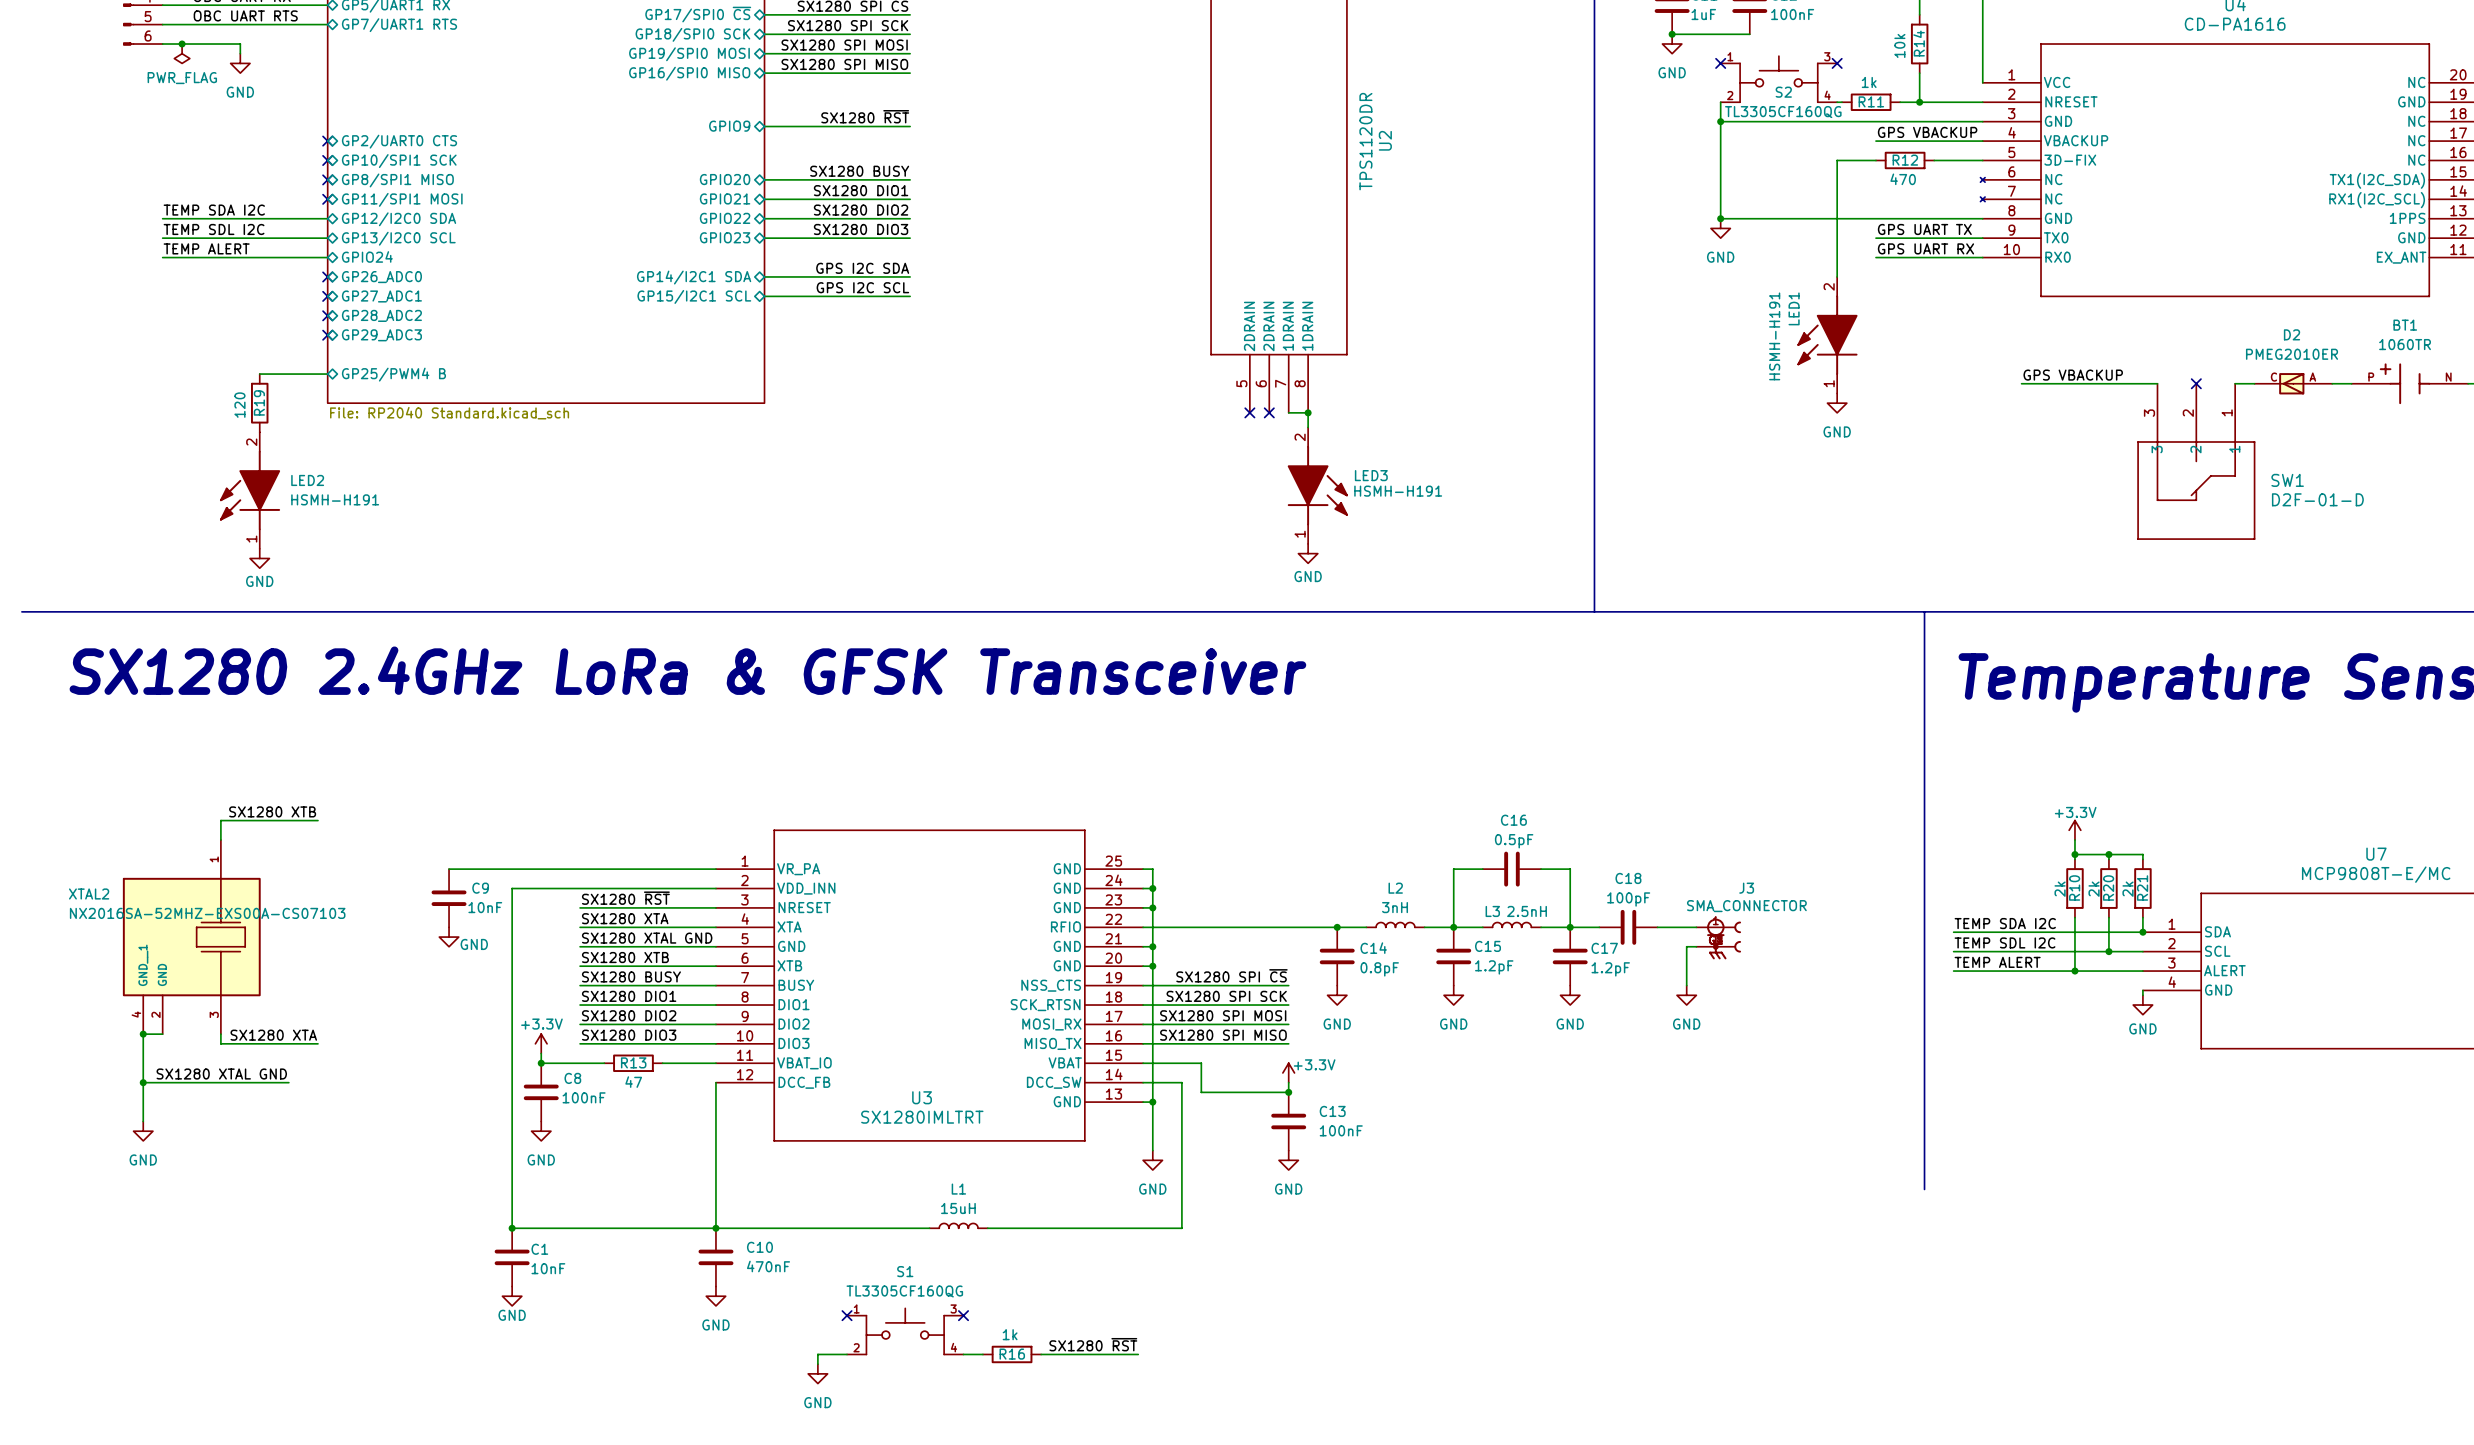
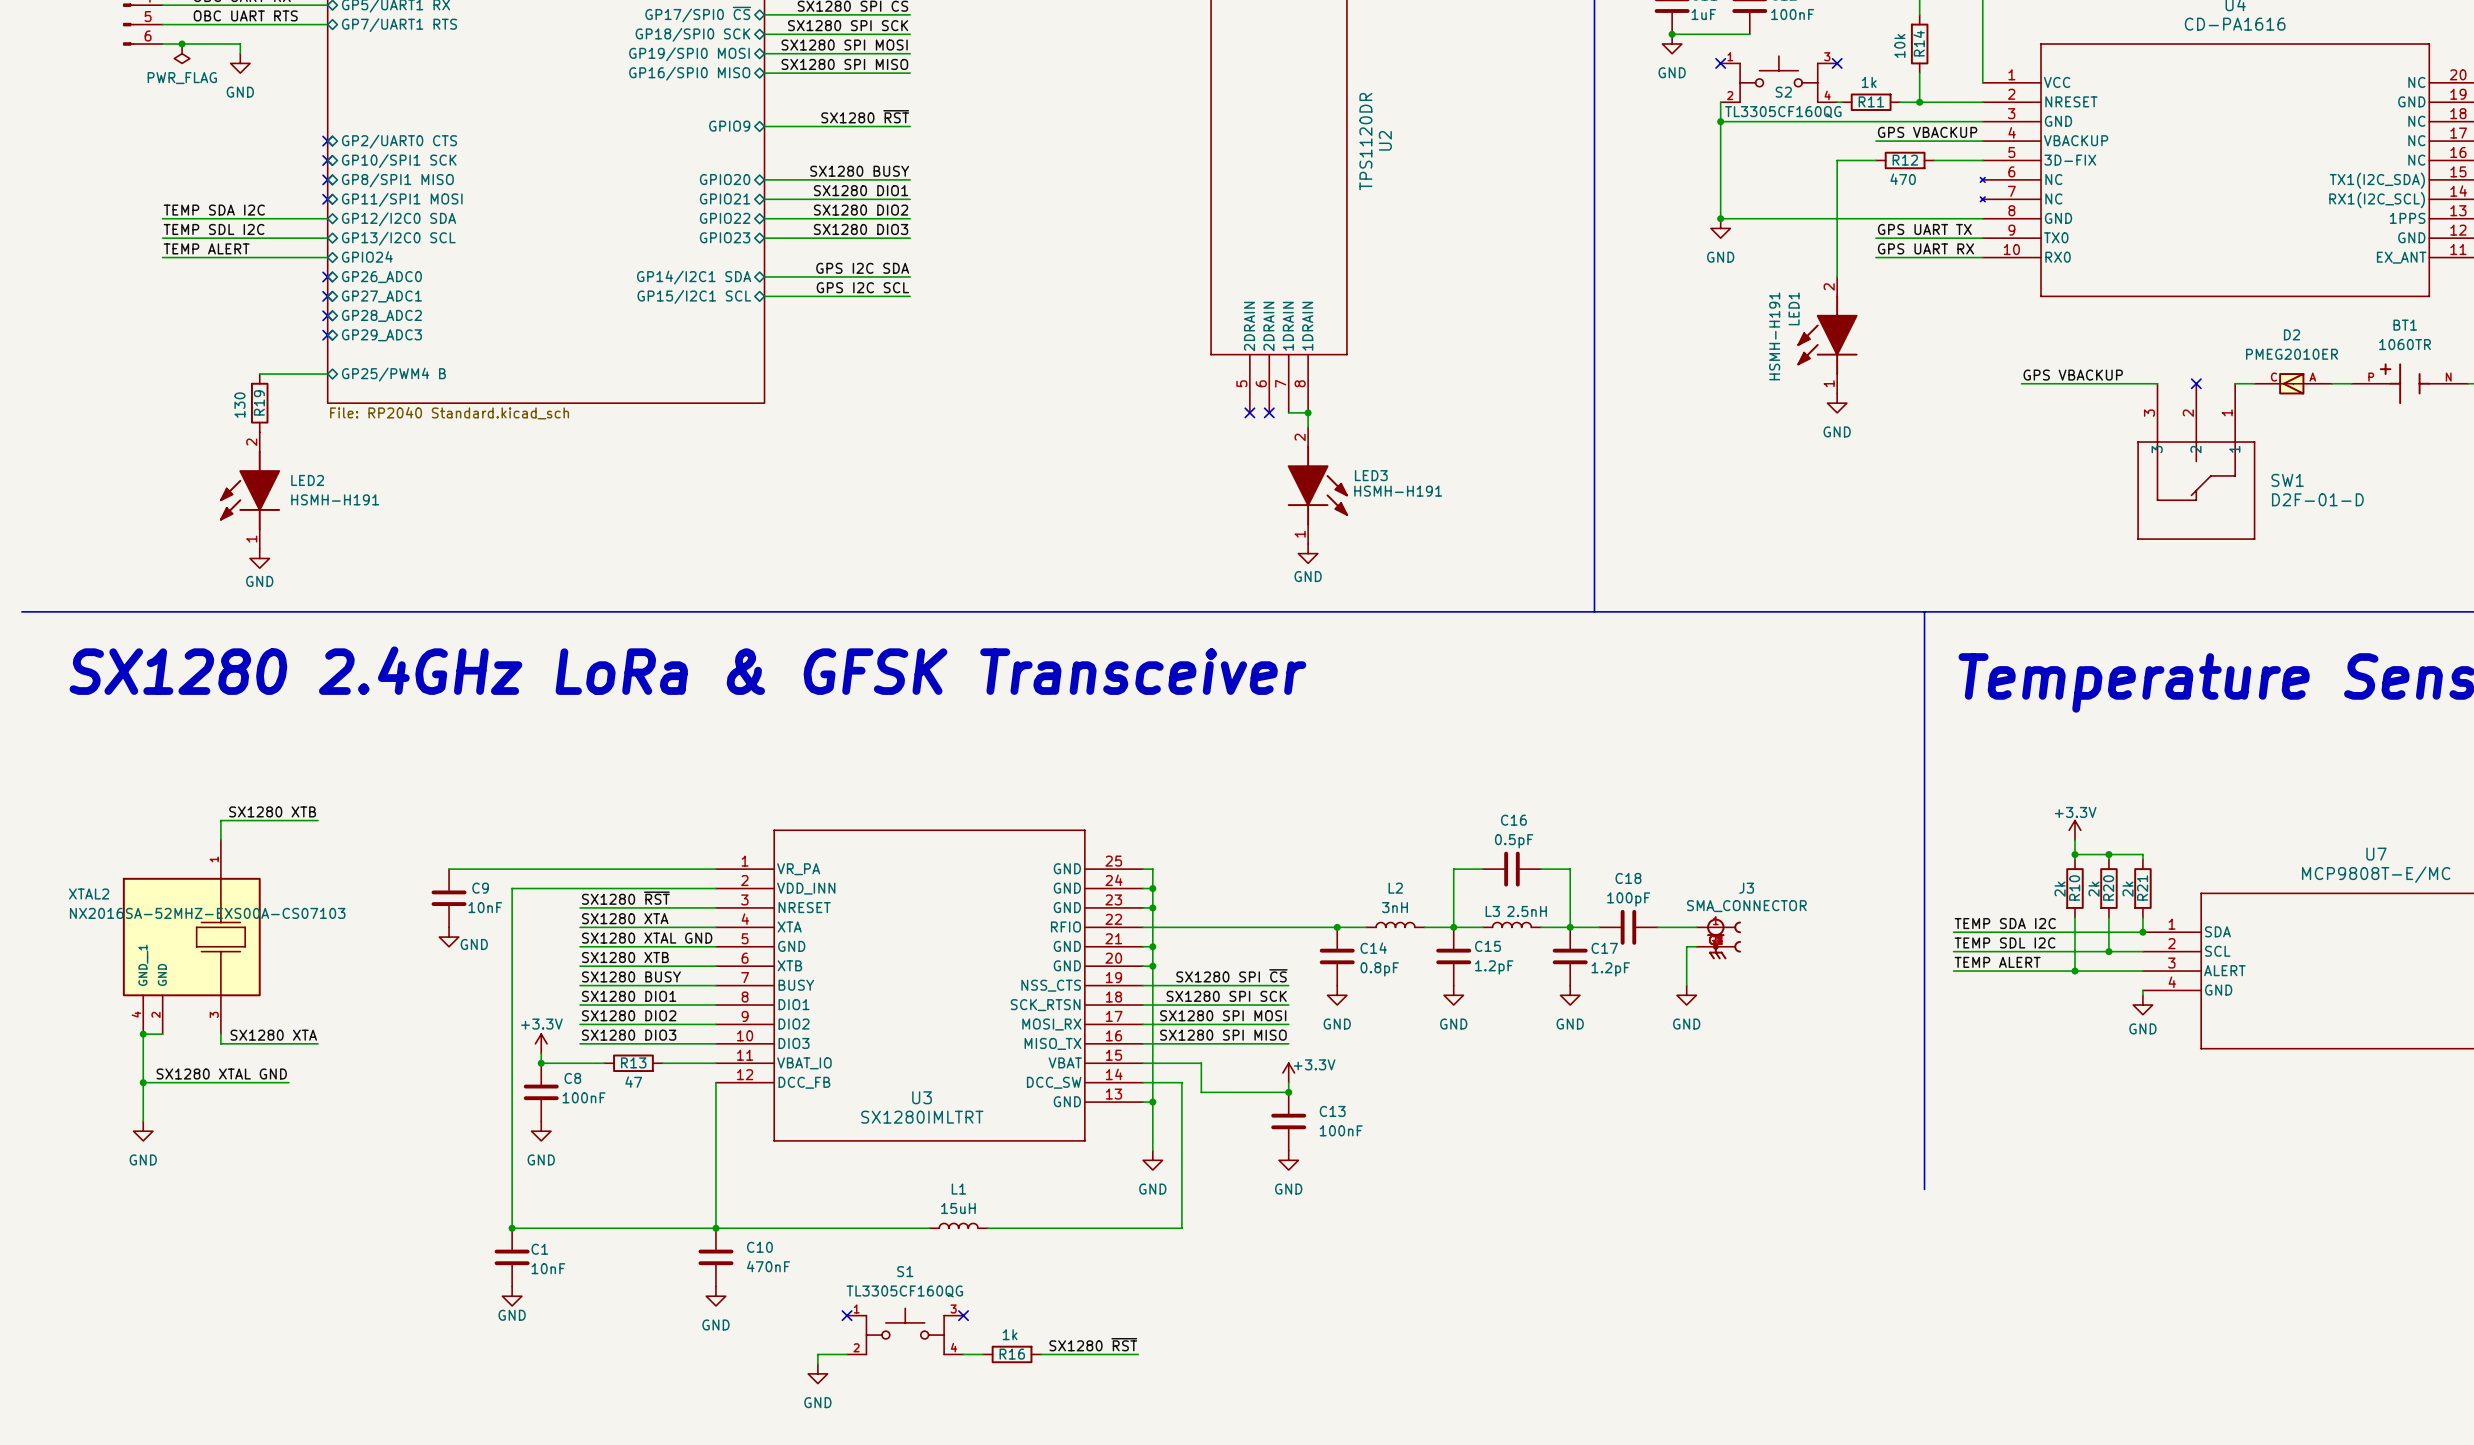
R19 value: 120 (239, 405) -> 130 (239, 405)

